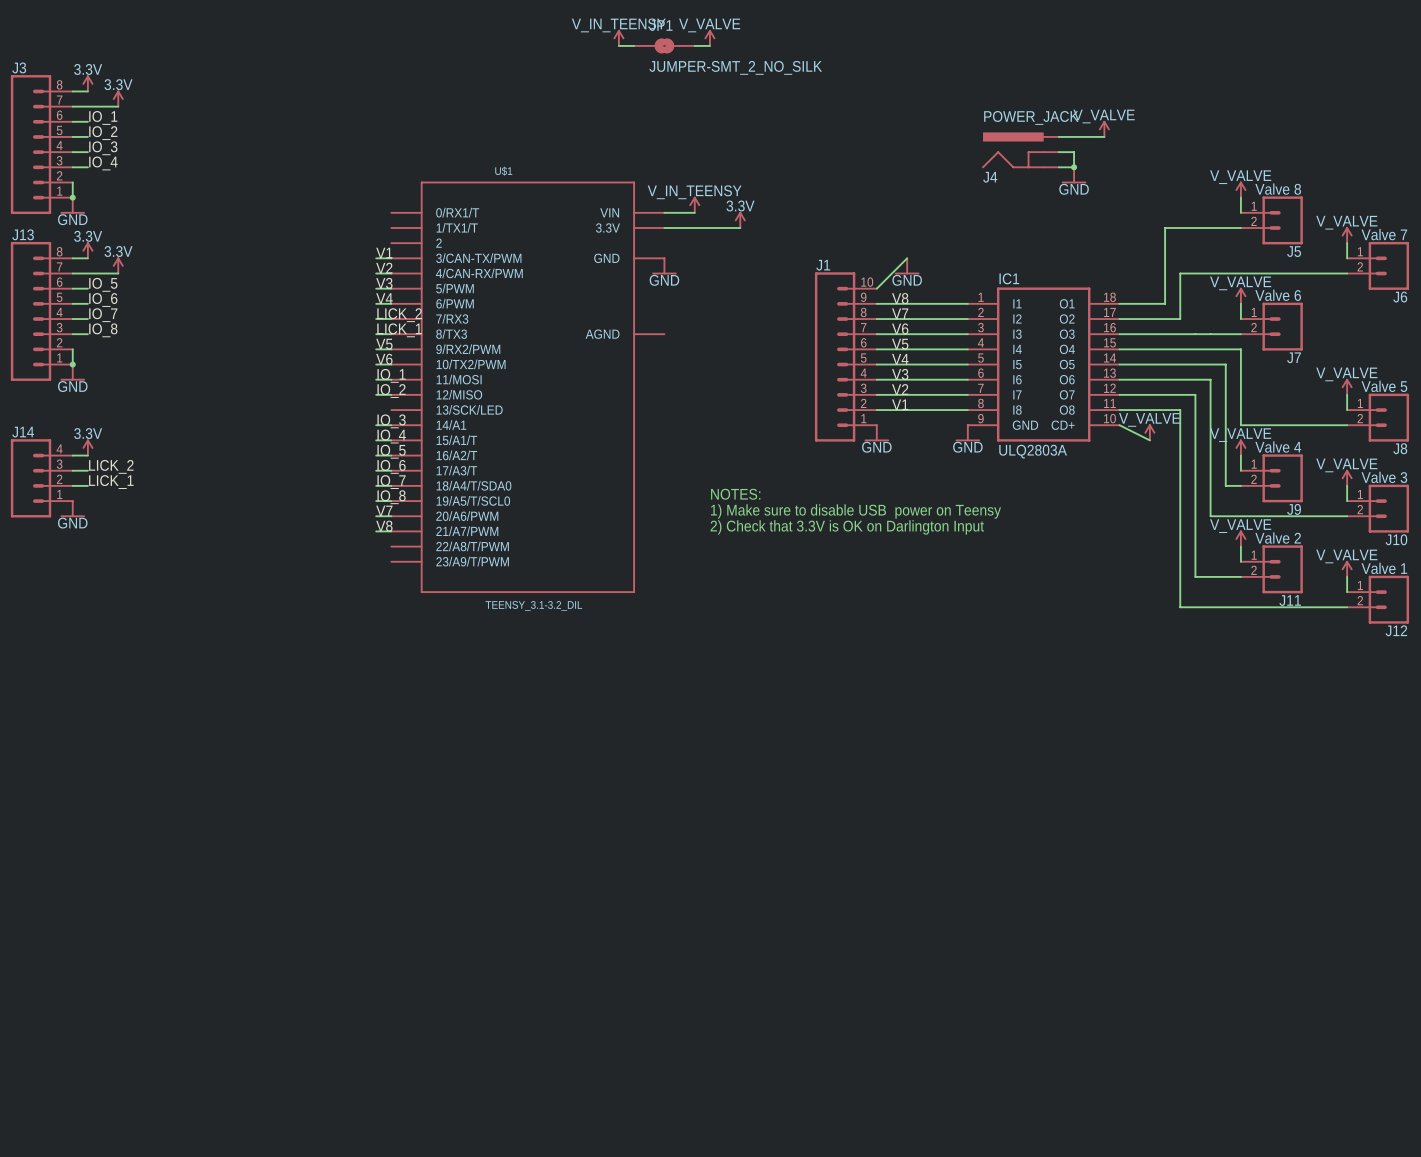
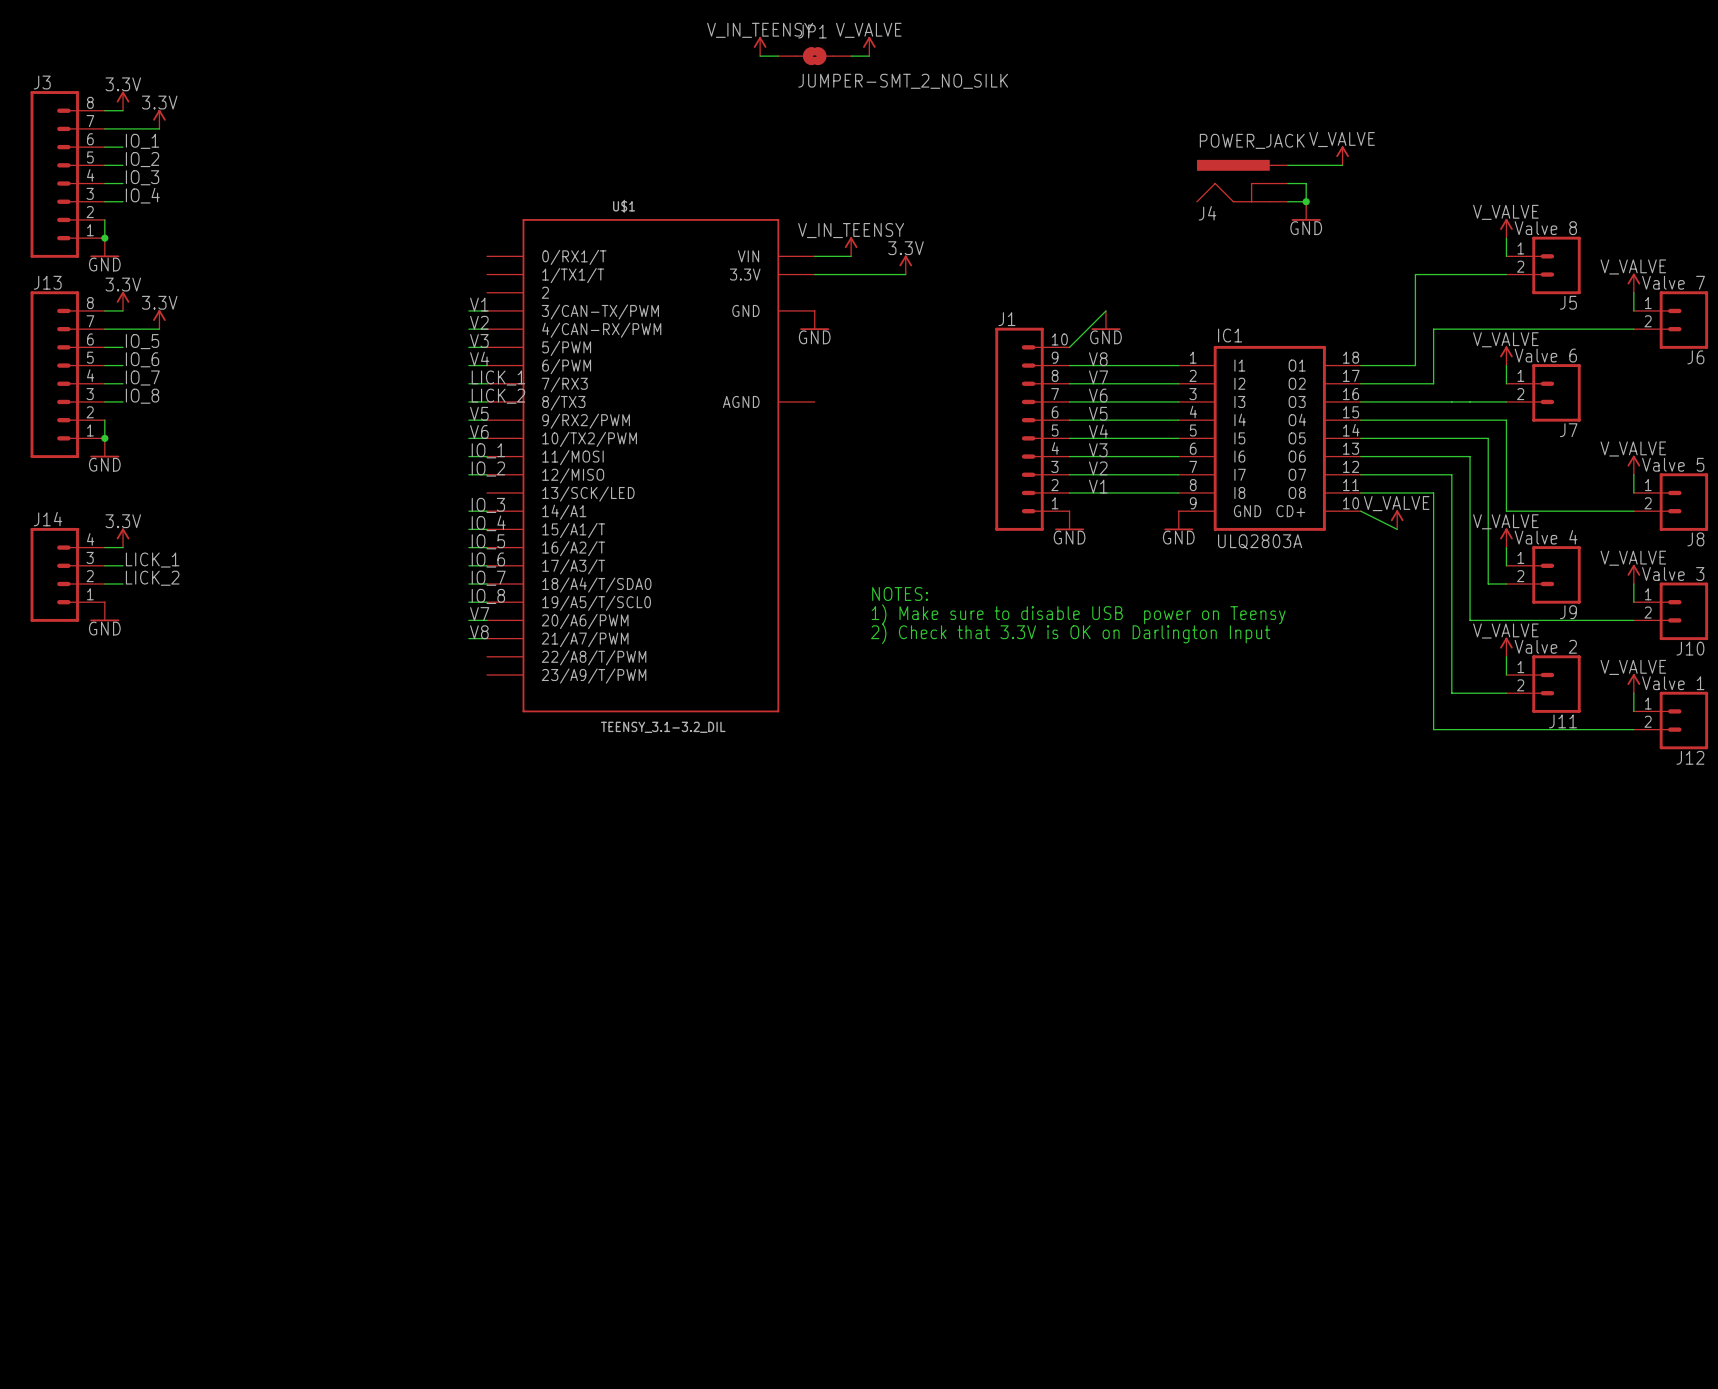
label: LICK_2 (399, 315) -> LICK_1 (498, 378)
label: LICK_1 (399, 330) -> LICK_2 (498, 396)
label: LICK_2 (111, 466) -> LICK_1 (152, 560)
label: LICK_1 (111, 482) -> LICK_2 (152, 578)

